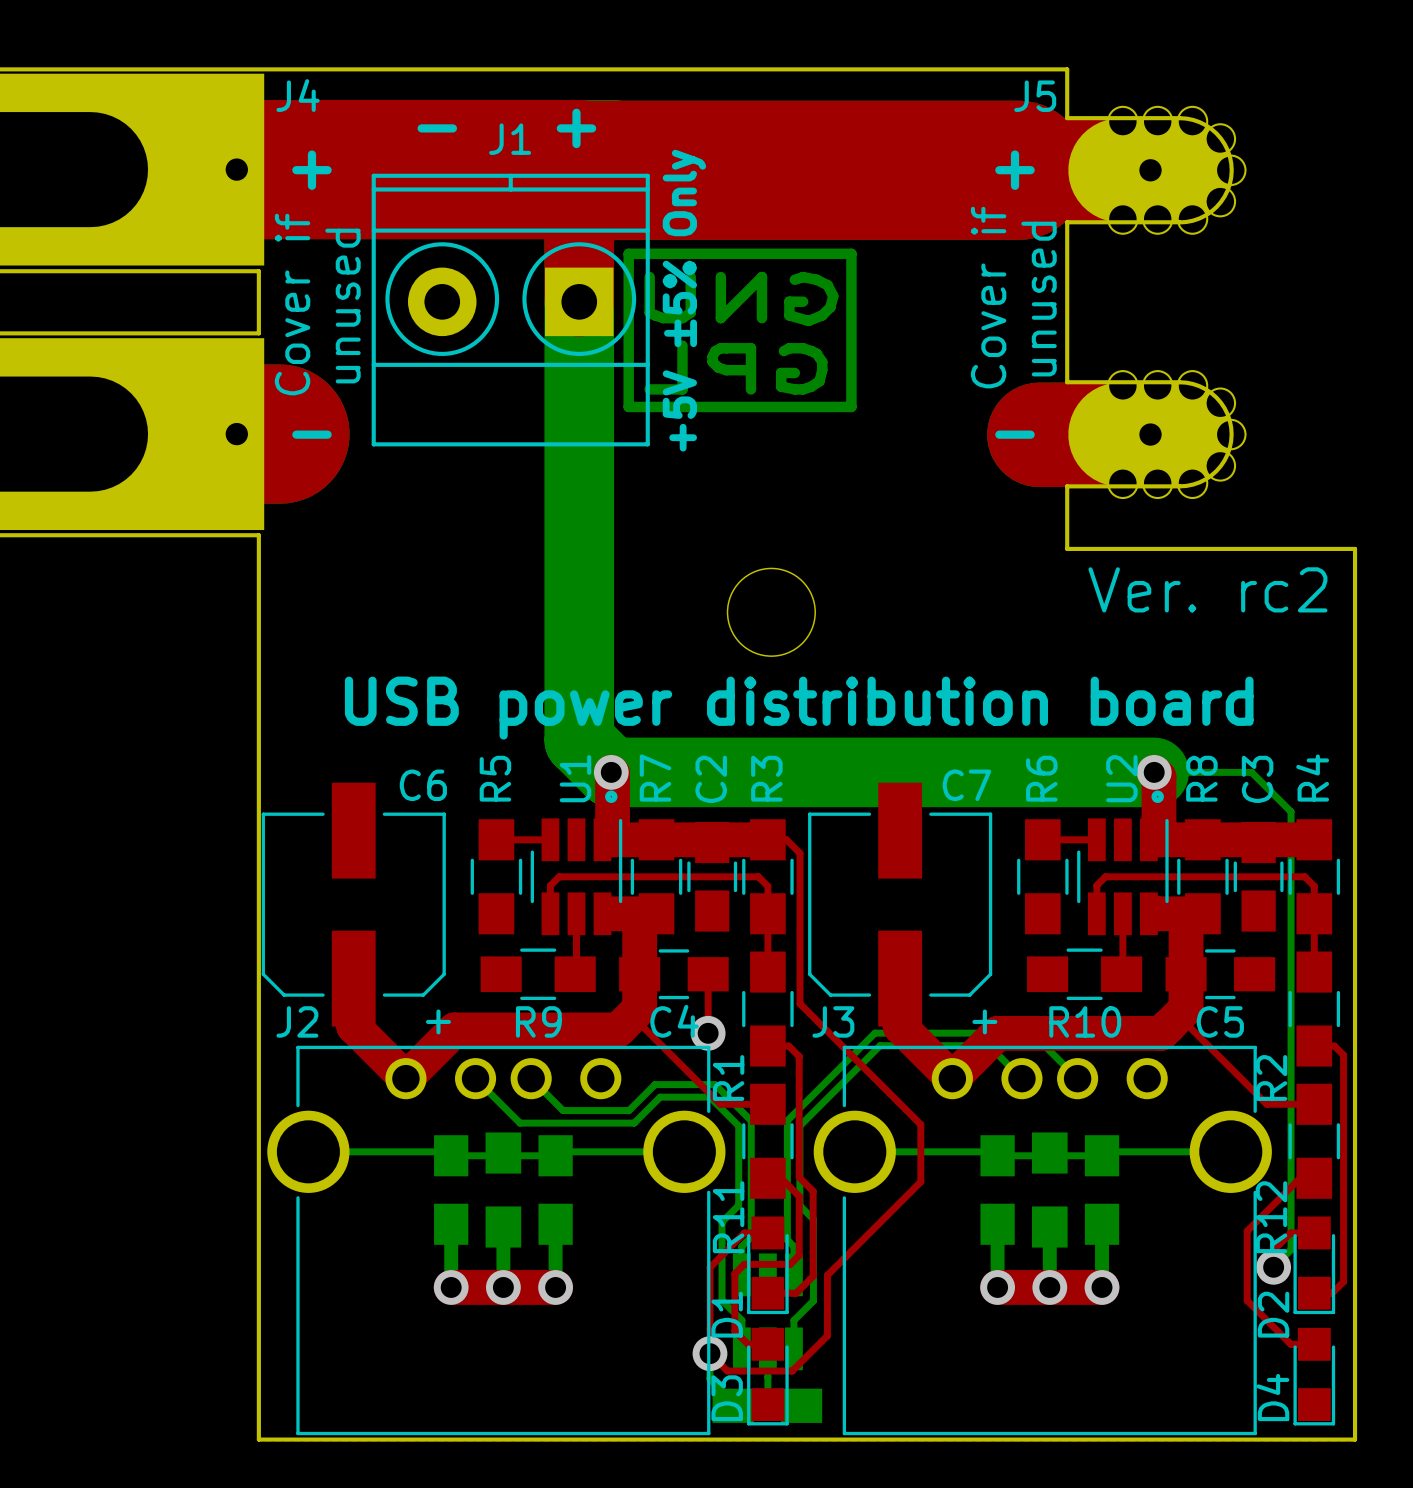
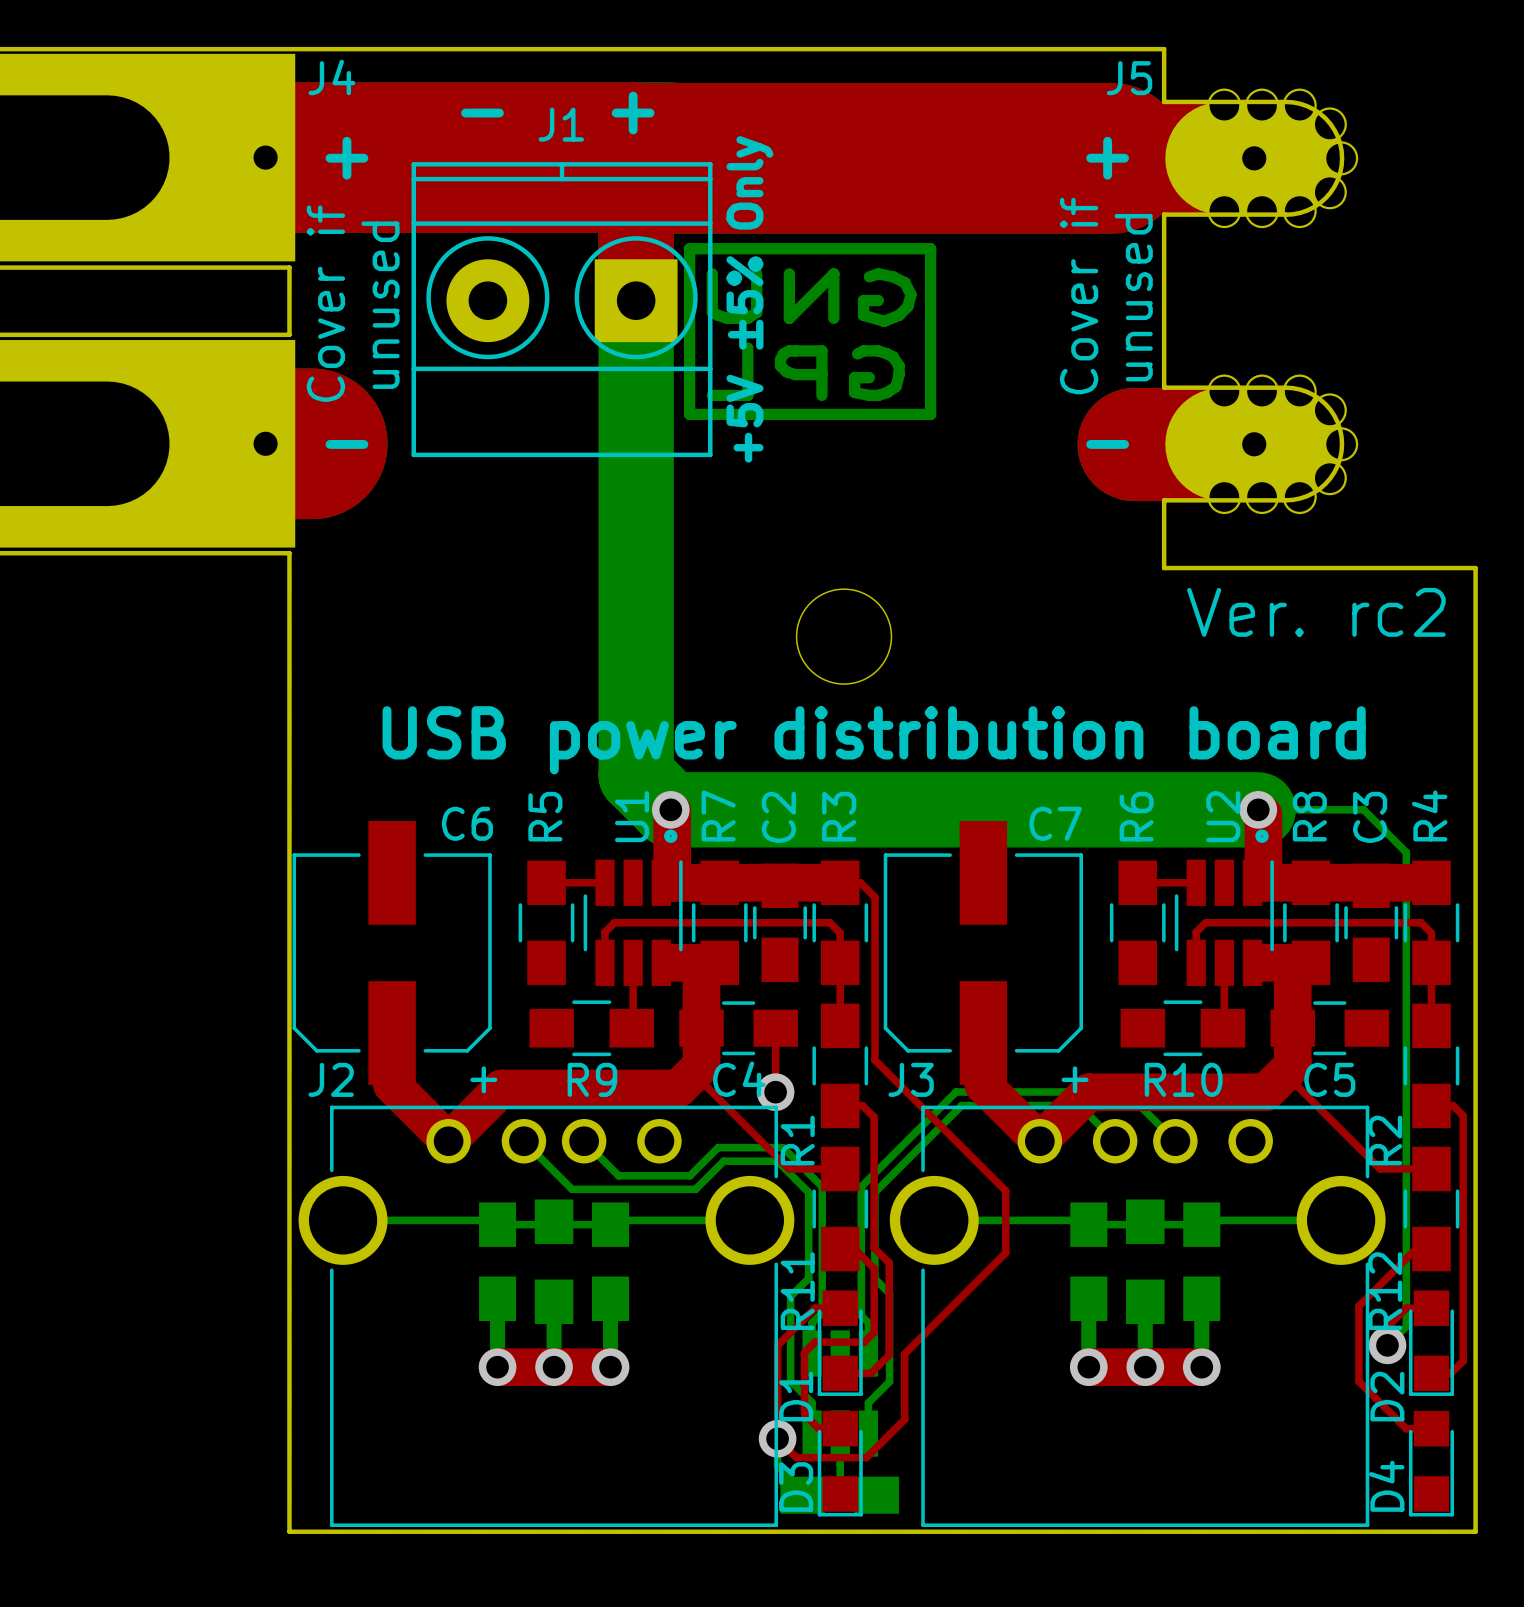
J1 footprint: [371, 173, 650, 447] -> [411, 162, 713, 458]

